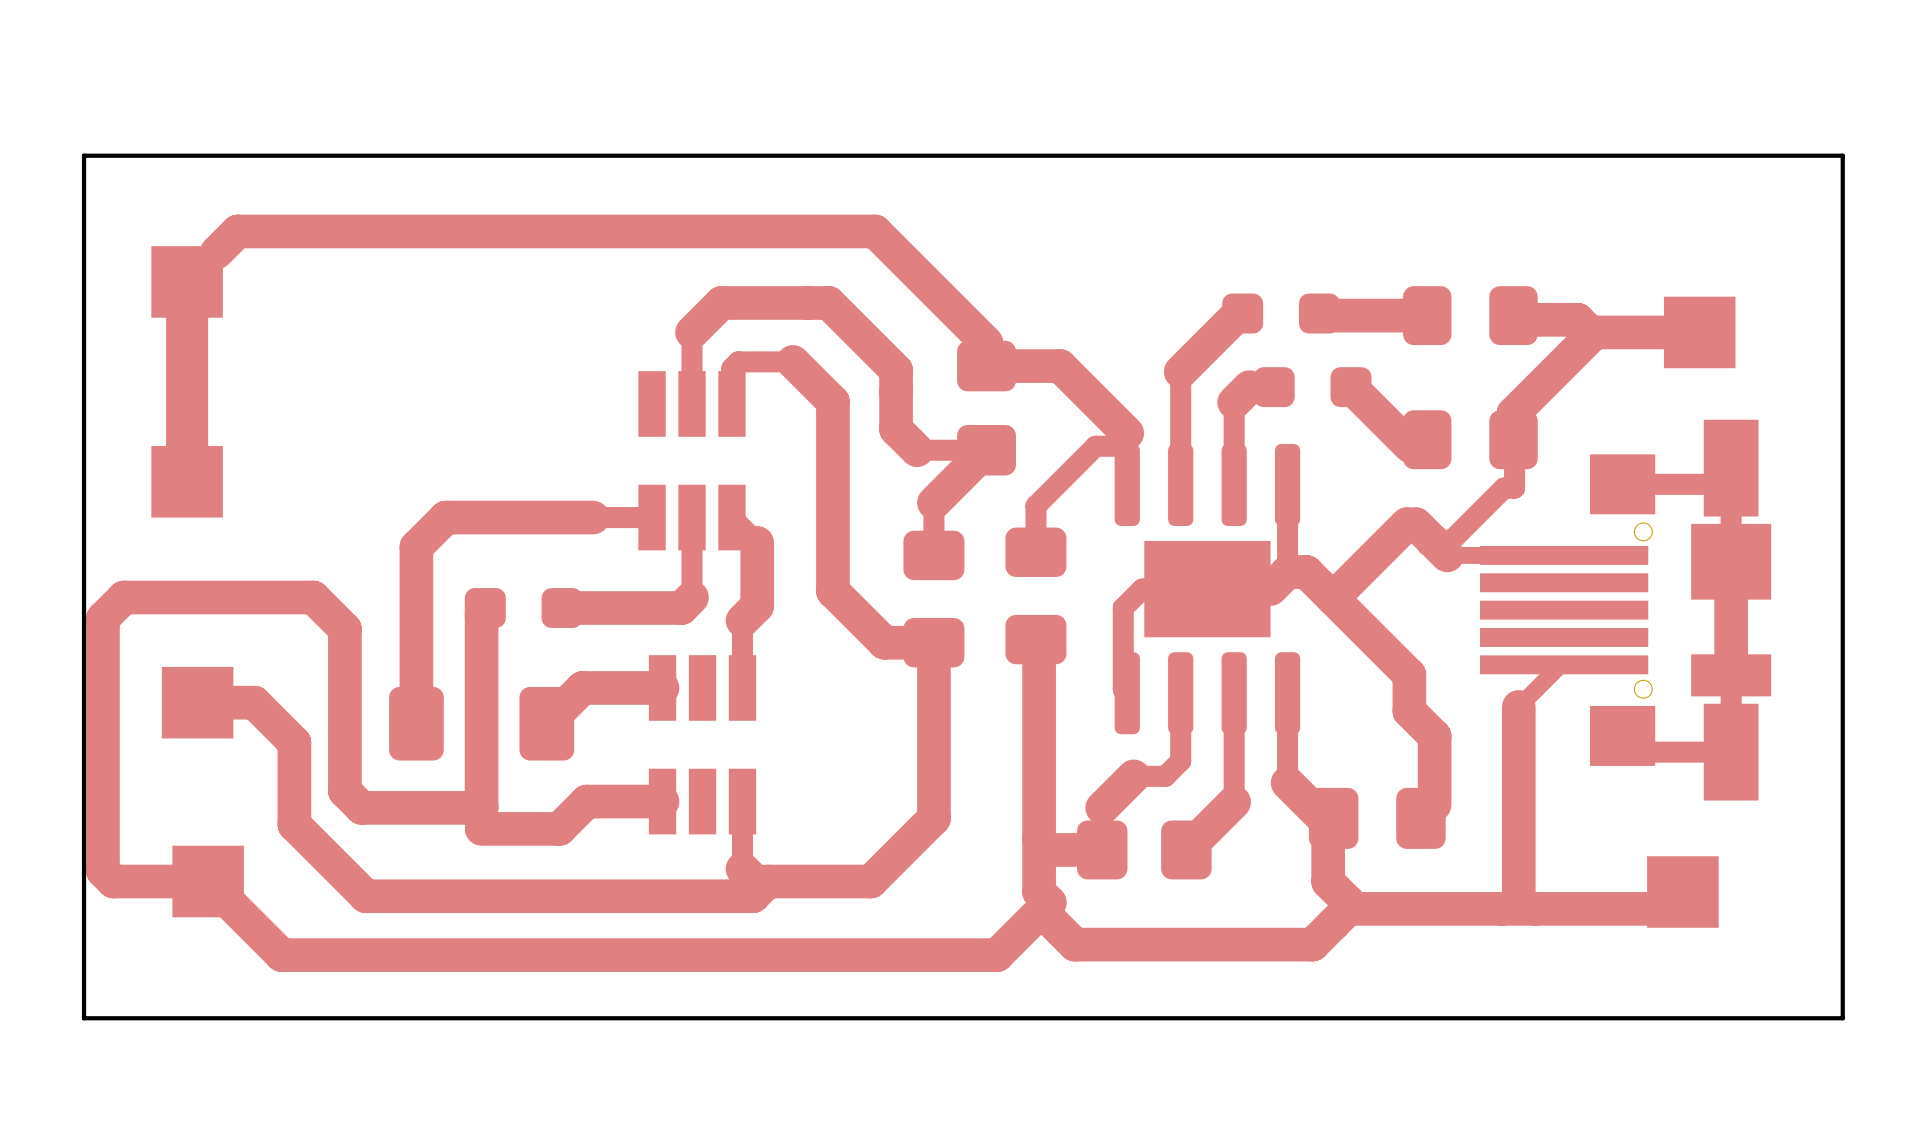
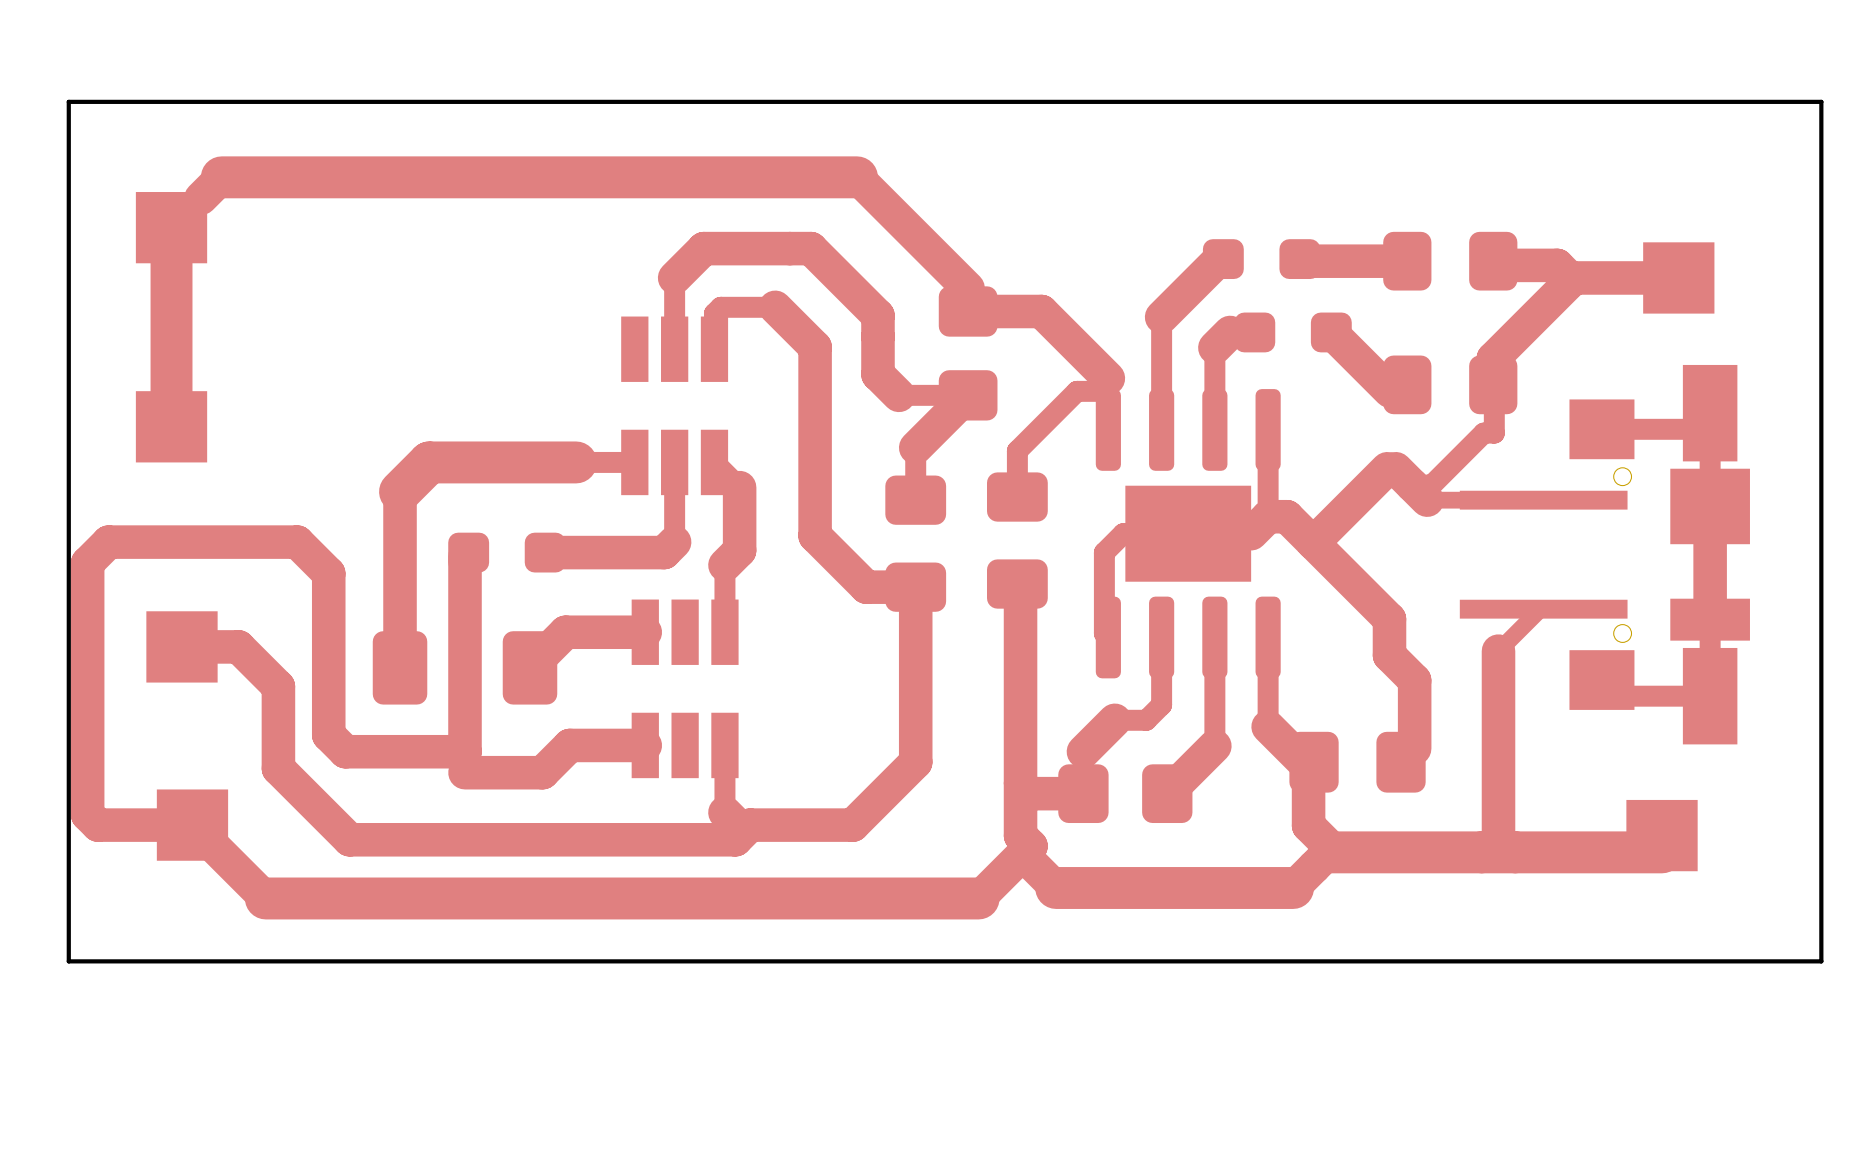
top track width: thin (875, 231) (237, 231) -> thick (857, 177) (221, 177)
part footprint: [1479, 419, 1772, 801] -> [1459, 364, 1750, 745]
top track width: thin (593, 517) (445, 517) (416, 547) -> thick (576, 462) (429, 462) (400, 491)
top track width: thin (1682, 908) (1348, 908) -> thick (1662, 852) (1328, 852)
top track width: thin (1312, 944) (1074, 944) -> thick (1293, 888) (1056, 888)
top track width: thin (997, 955) (281, 955) -> thick (978, 898) (265, 898)

